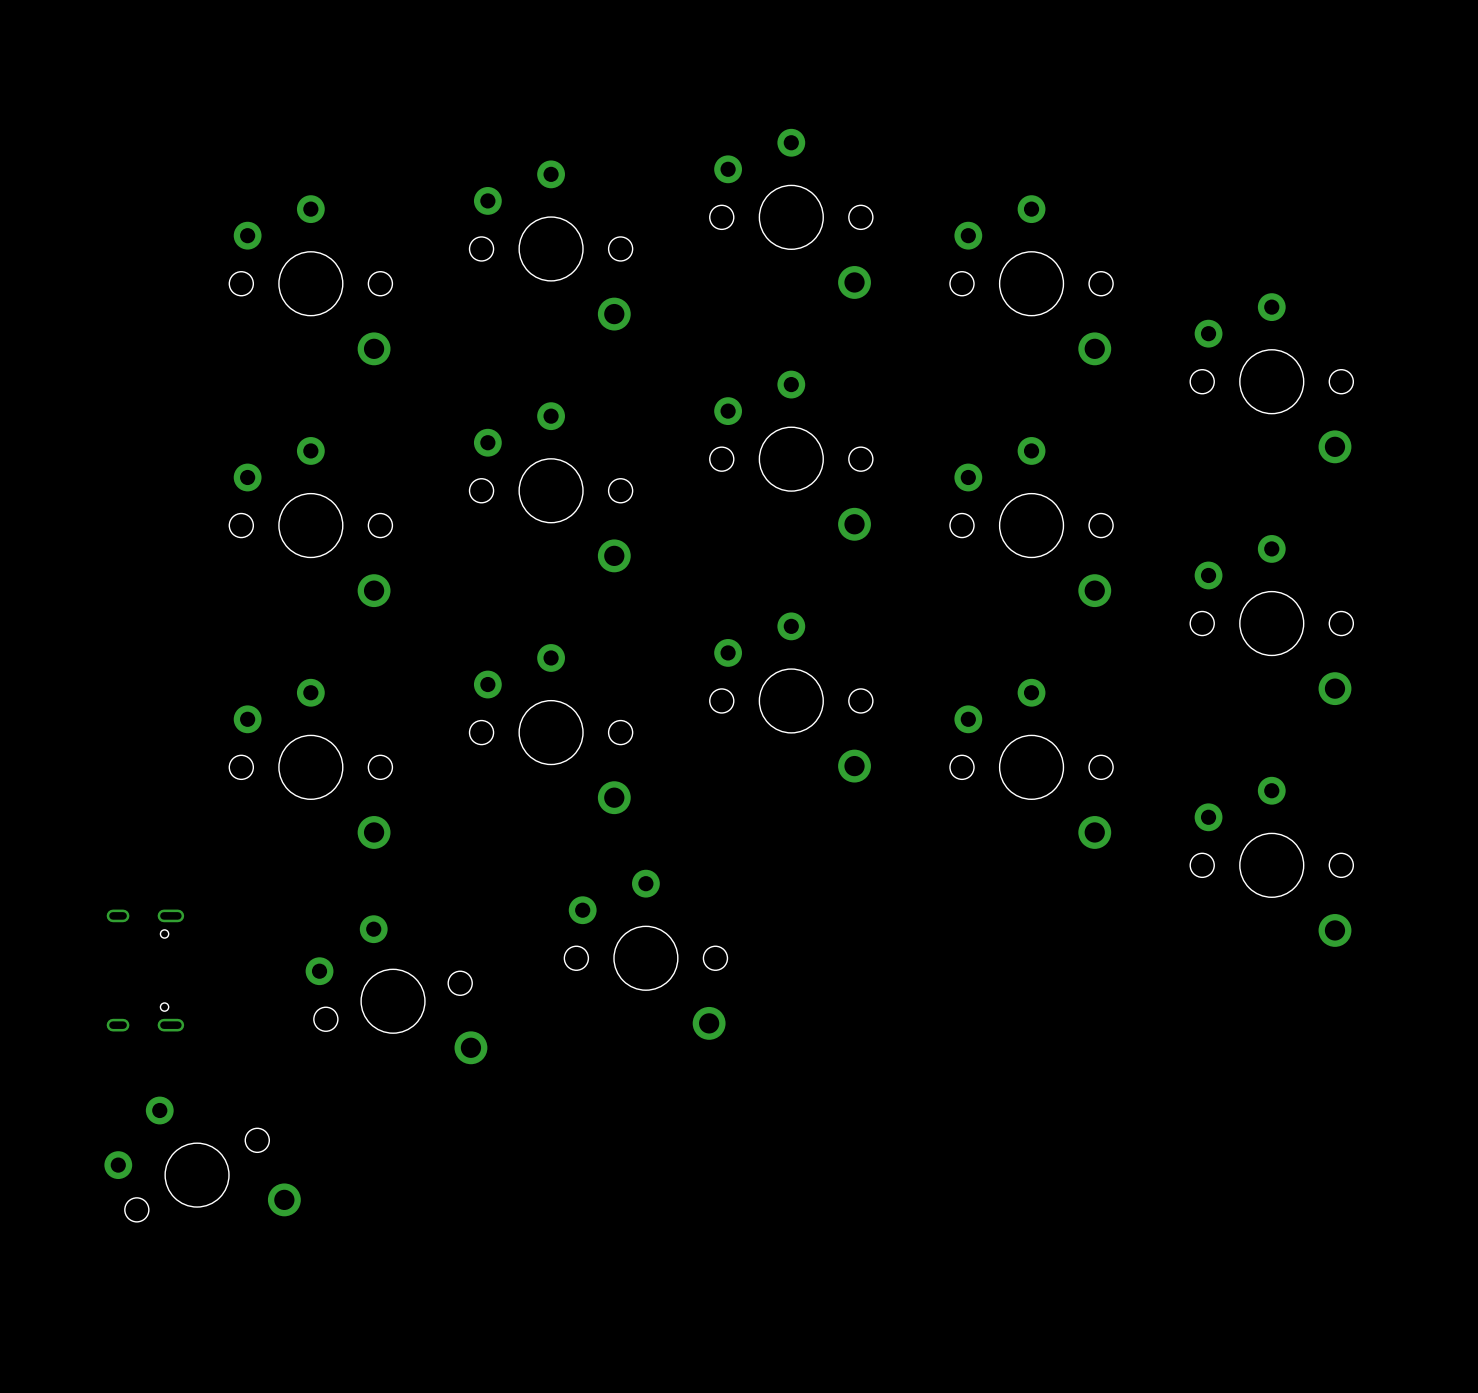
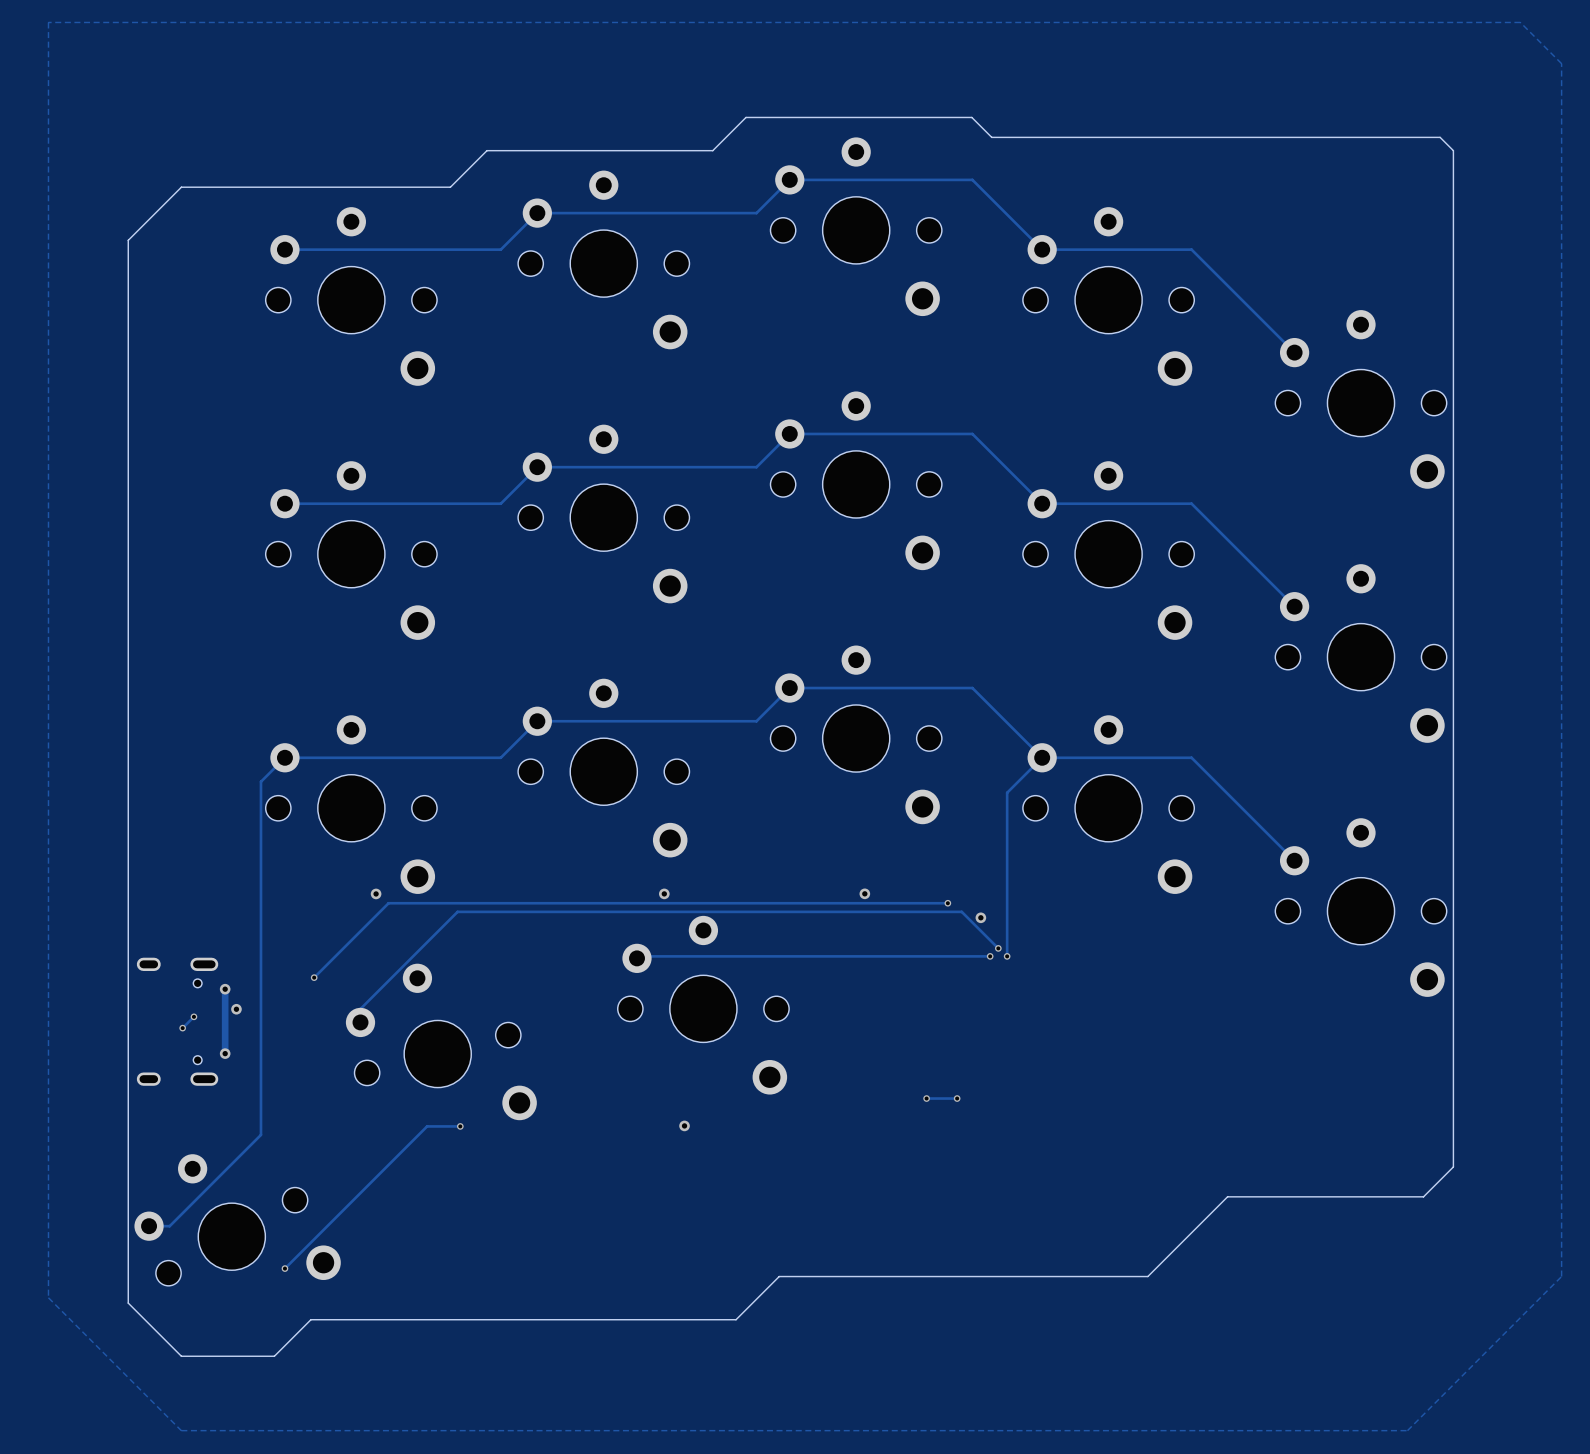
zone outline: none -> (1520, 22) (48, 22) (48, 1297) (181, 1430) (1407, 1430) (1561, 1276) (1561, 63) (1520, 22)
board edge: none -> (971, 117) (746, 117) (712, 150) (486, 150) (450, 187) (181, 187) (128, 240) (128, 1303) (181, 1356) (274, 1356) (310, 1319) (736, 1319) (779, 1276) (1147, 1276) (1227, 1196) (1423, 1196) (1453, 1166) (1453, 150) (1440, 137) (991, 137) (971, 117)
track: none -> (284, 249) (500, 249) (537, 213) (756, 213) (789, 179) (972, 179) (1042, 249) (1191, 249) (1294, 352)
track: none -> (284, 503) (500, 503) (537, 467) (756, 467) (789, 433) (972, 433) (1042, 503) (1191, 503) (1294, 606)
track: none -> (1042, 757) (1007, 792) (1007, 956)
track: none -> (1042, 757) (1191, 757) (1294, 860)
track: none -> (1042, 757) (972, 688) (789, 688) (756, 721) (537, 721) (500, 757) (284, 757) (260, 781) (260, 1134) (169, 1226) (149, 1226)
via: none -> (376, 893)
via: none -> (664, 893)
via: none -> (864, 893)
track: none -> (947, 903) (388, 903) (314, 977)
via: none -> (947, 903)
via: none -> (980, 917)
track: none -> (998, 948) (961, 911) (457, 911) (360, 1008) (360, 1022)
via: none -> (998, 948)
track: none -> (990, 956) (638, 956) (636, 958)
via: none -> (990, 956)
via: none -> (1007, 956)
via: none -> (314, 977)
track: none -> (225, 989) (225, 1053)
via: none -> (225, 989)
via: none -> (236, 1009)
track: none -> (193, 1016) (182, 1028)
via: none -> (193, 1016)
via: none -> (182, 1028)
via: none -> (225, 1053)
via: none -> (926, 1098)
track: none -> (957, 1098) (926, 1098)
via: none -> (957, 1098)
via: none -> (684, 1125)
track: none -> (460, 1126) (427, 1126) (284, 1268)
via: none -> (460, 1126)
via: none -> (284, 1268)

